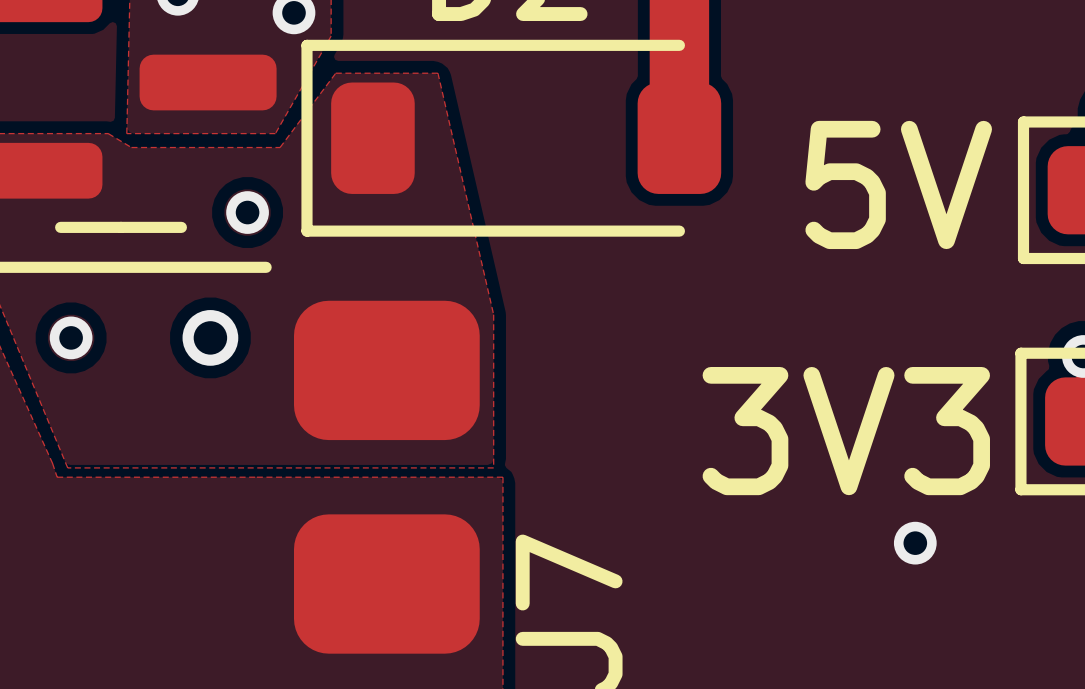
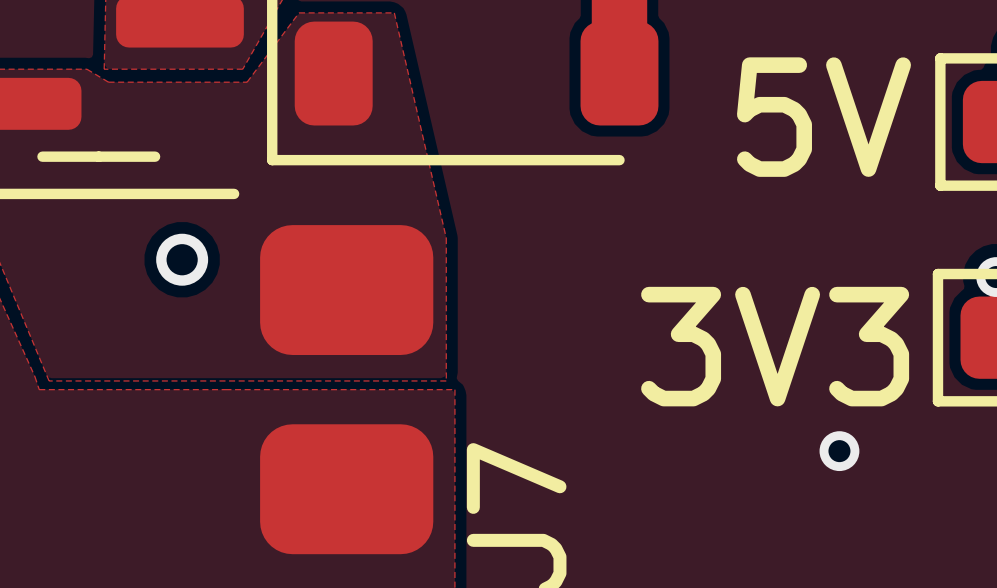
via: (247, 212) -> none
via: (71, 337) -> none

